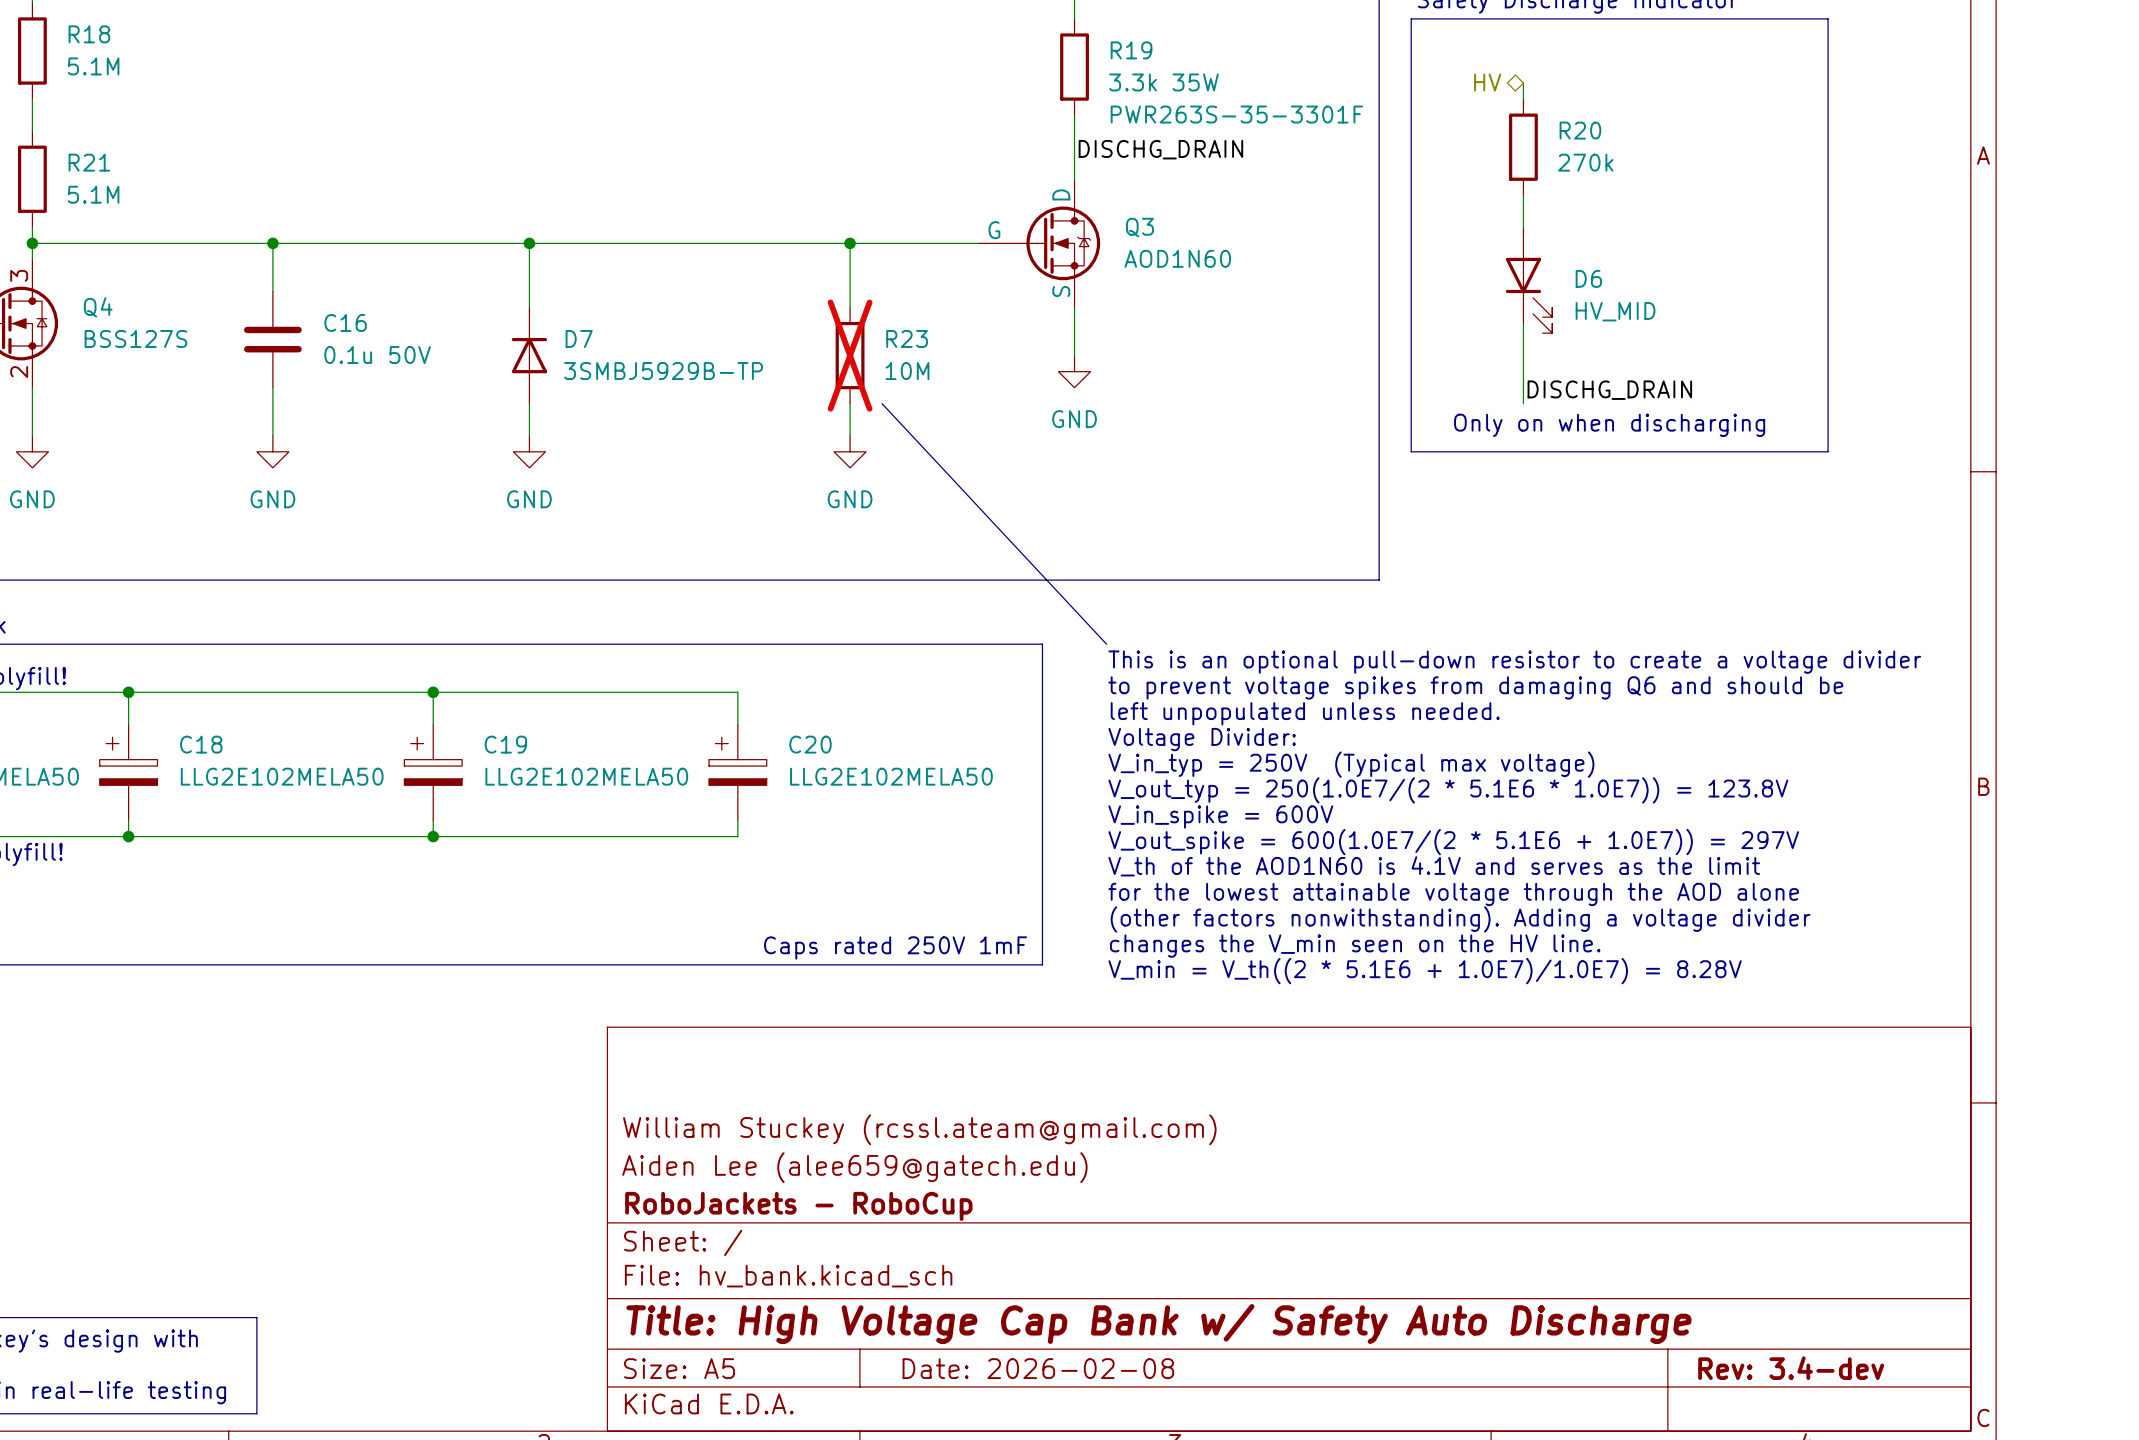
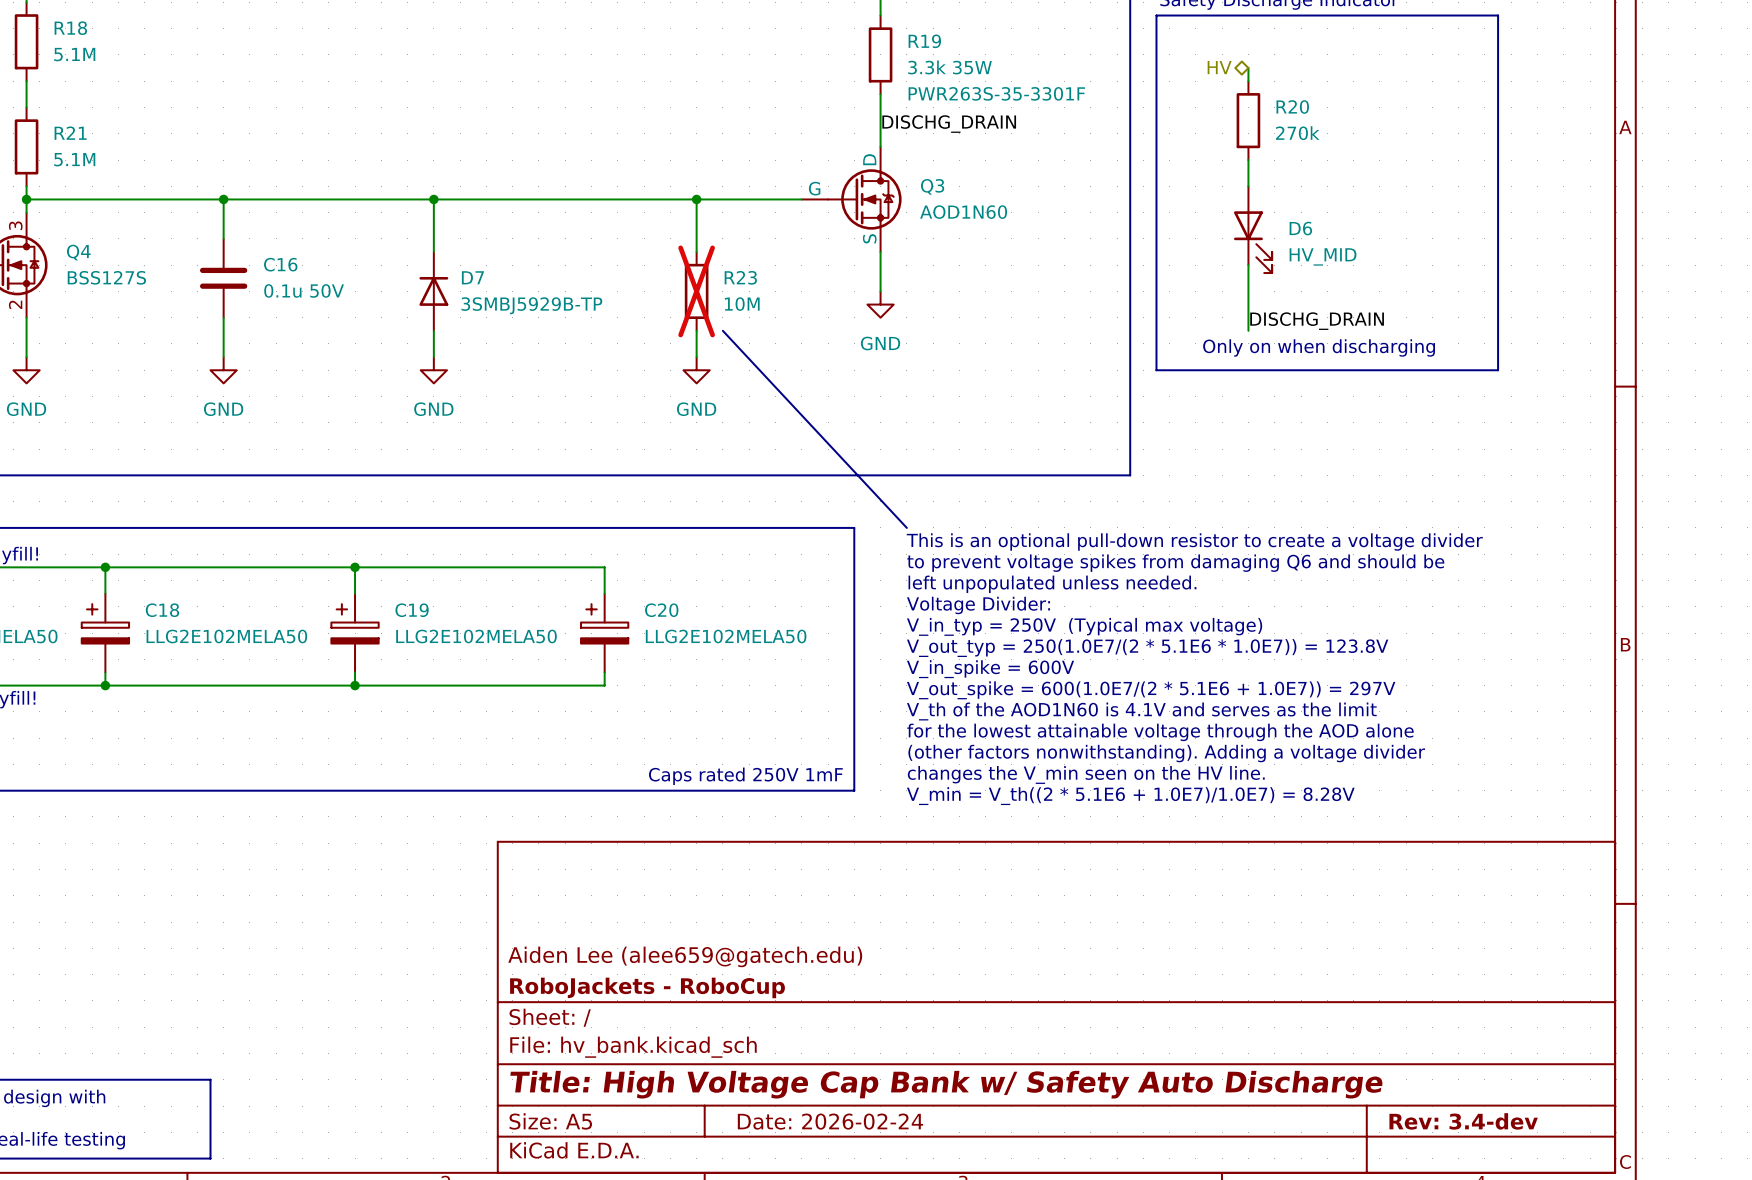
title block: William Stuckey (rcssl.ateam@gmail.com) (919, 1129) -> none
title block: Date: 2026-02-08 (1038, 1368) -> Date: 2026-02-24 (830, 1121)

